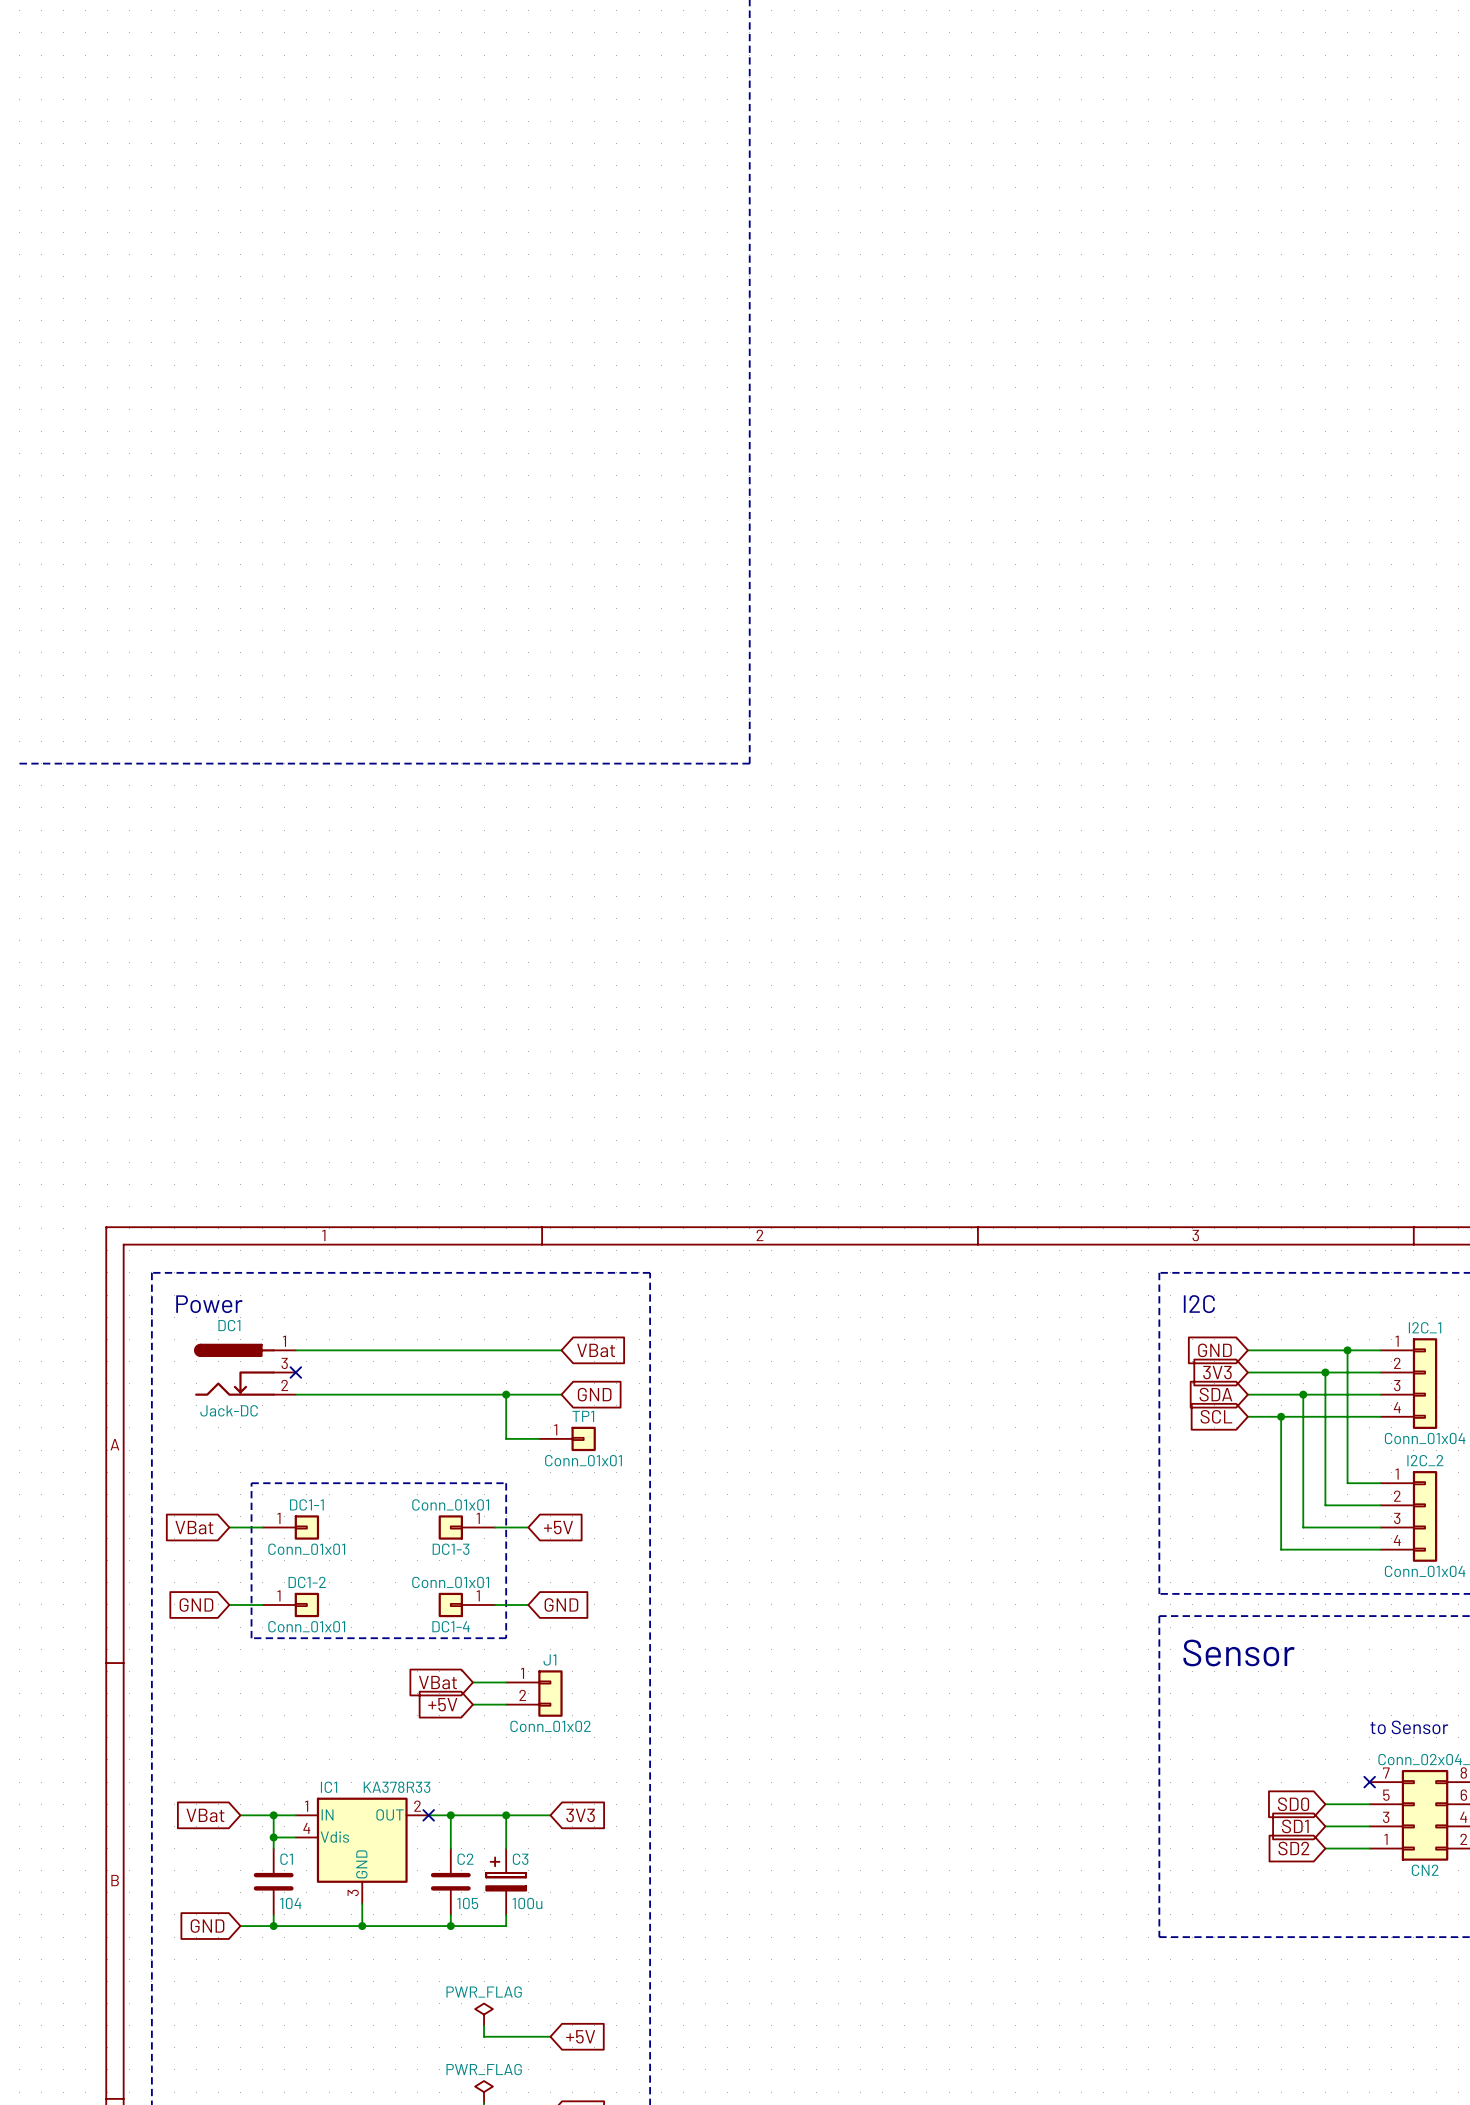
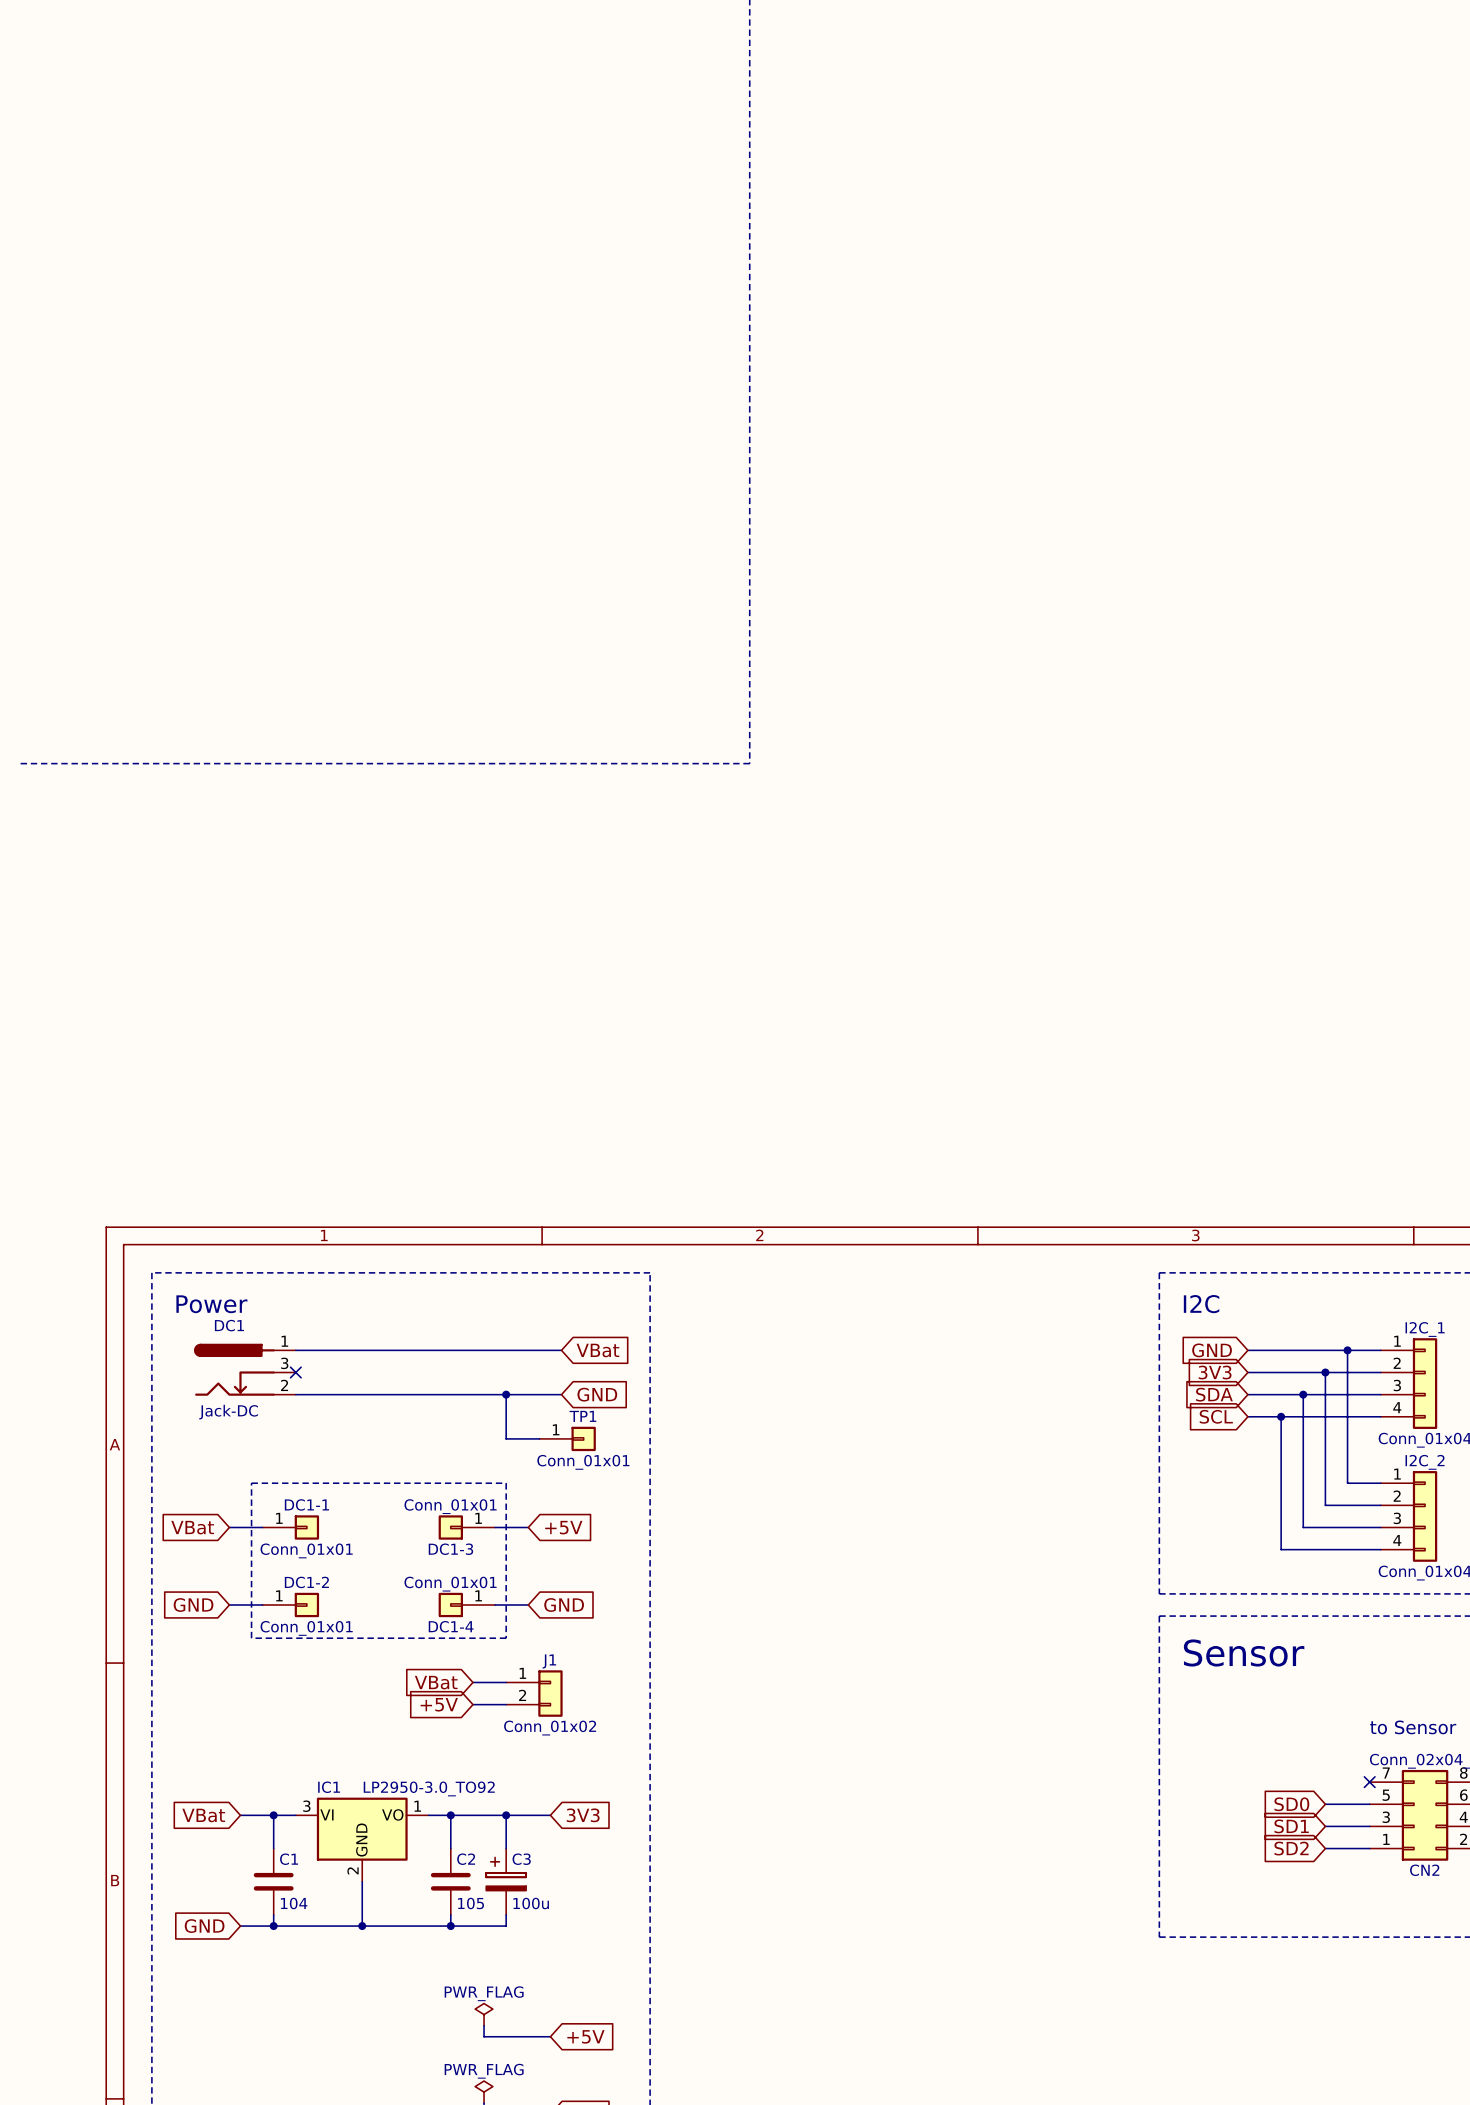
IC1 value: KA378R33 (397, 1787) -> LP2950-3.0_TO92 (429, 1788)
IC1 symbol: [295, 1797, 429, 1904] -> [295, 1797, 429, 1882]
no-connect mark: (428, 1815) -> none
wire: (273, 1837) (295, 1837) -> none
junction: (273, 1837) -> none

